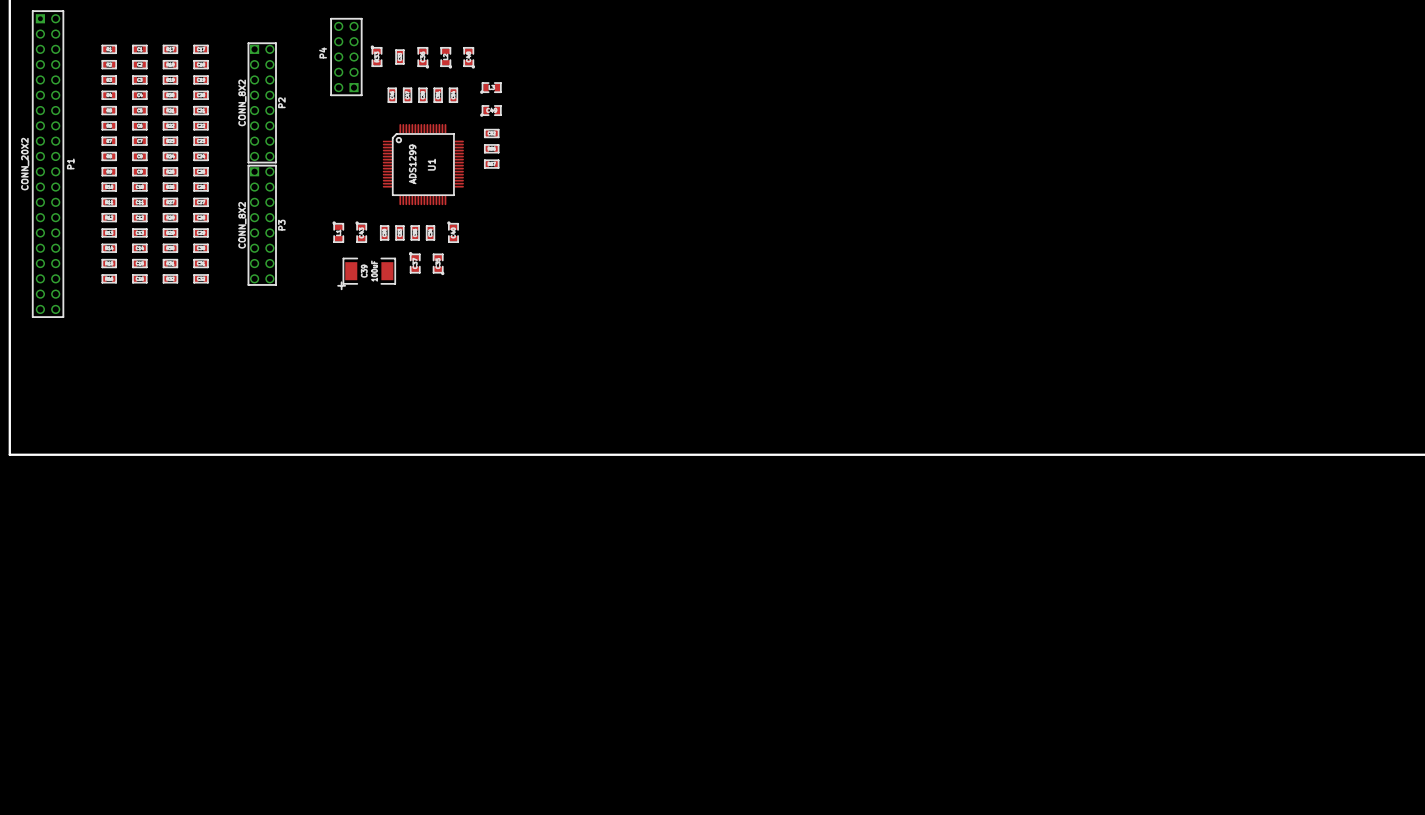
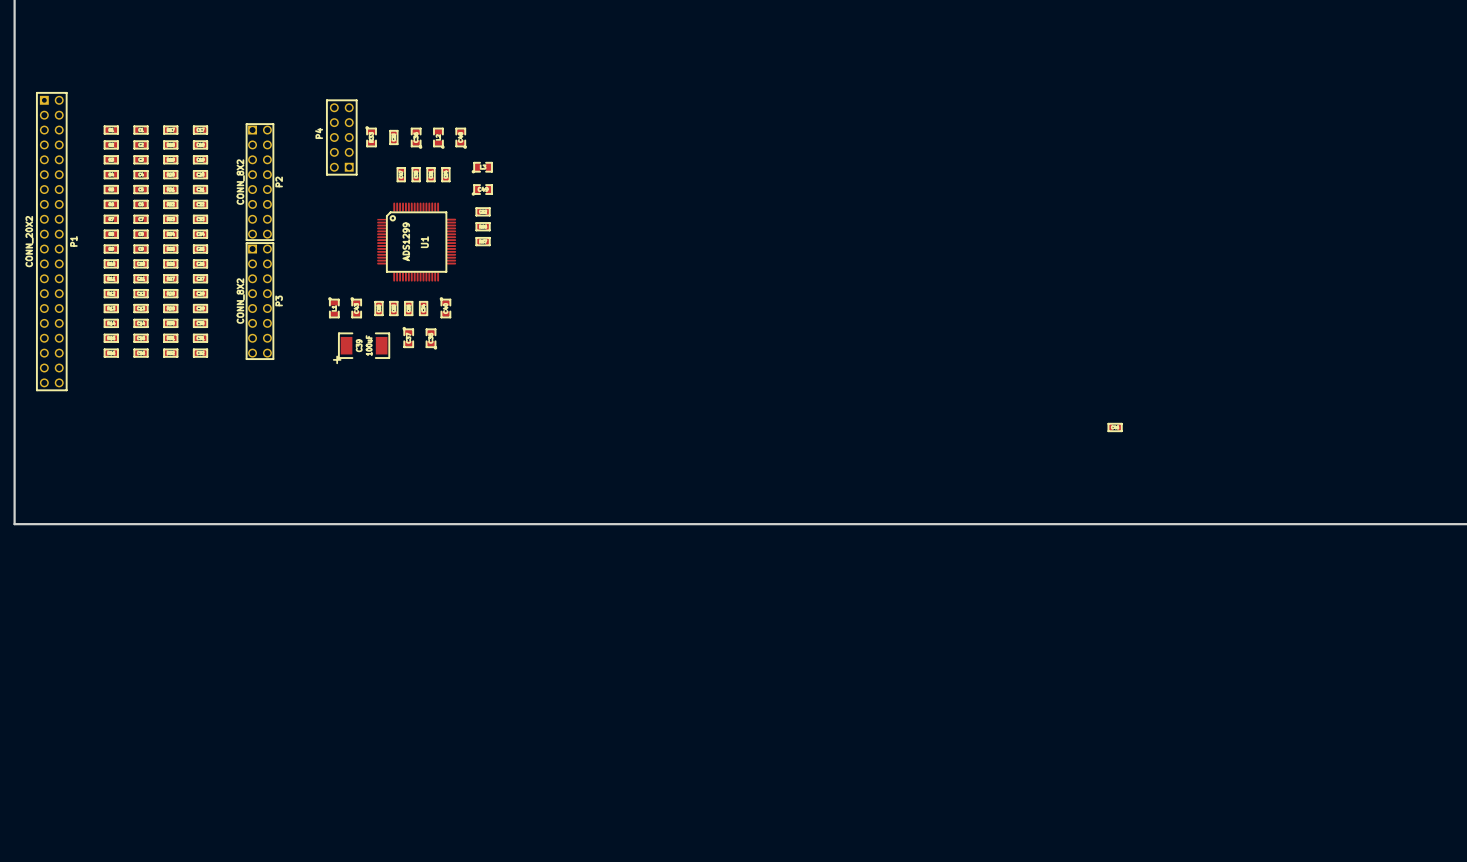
part rotation: 0° (392, 95) -> 90° clockwise (1115, 427)
part position: (392, 95) -> (1115, 427)

